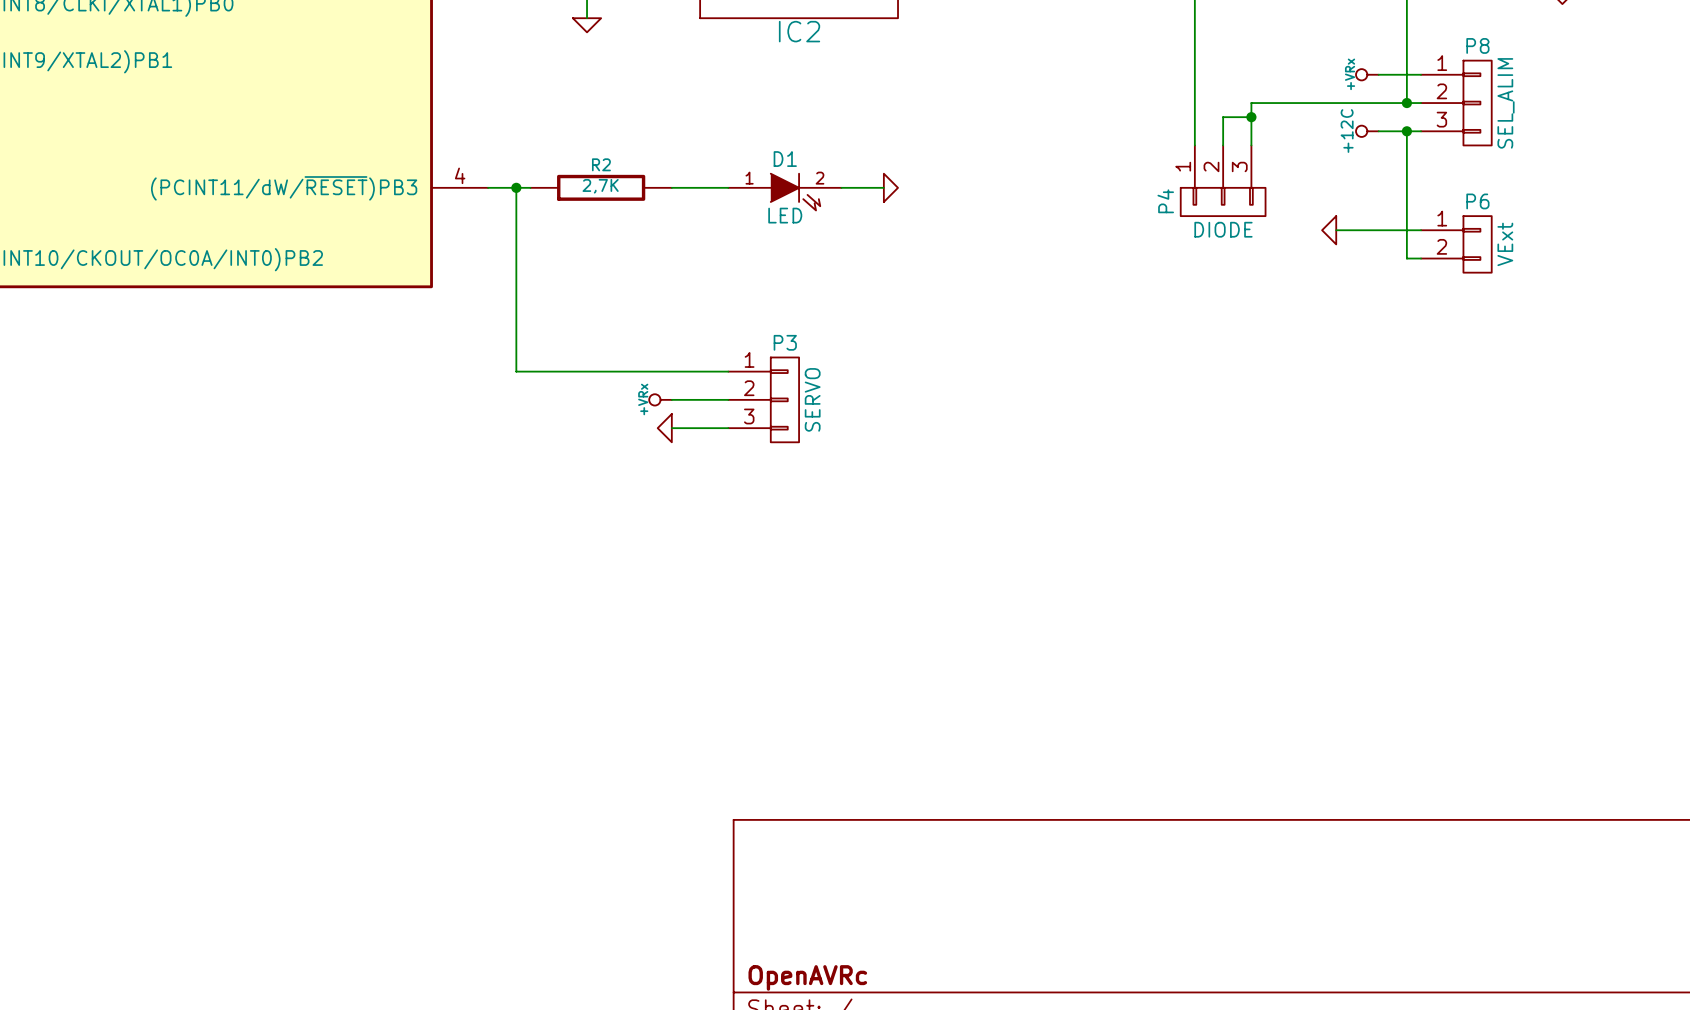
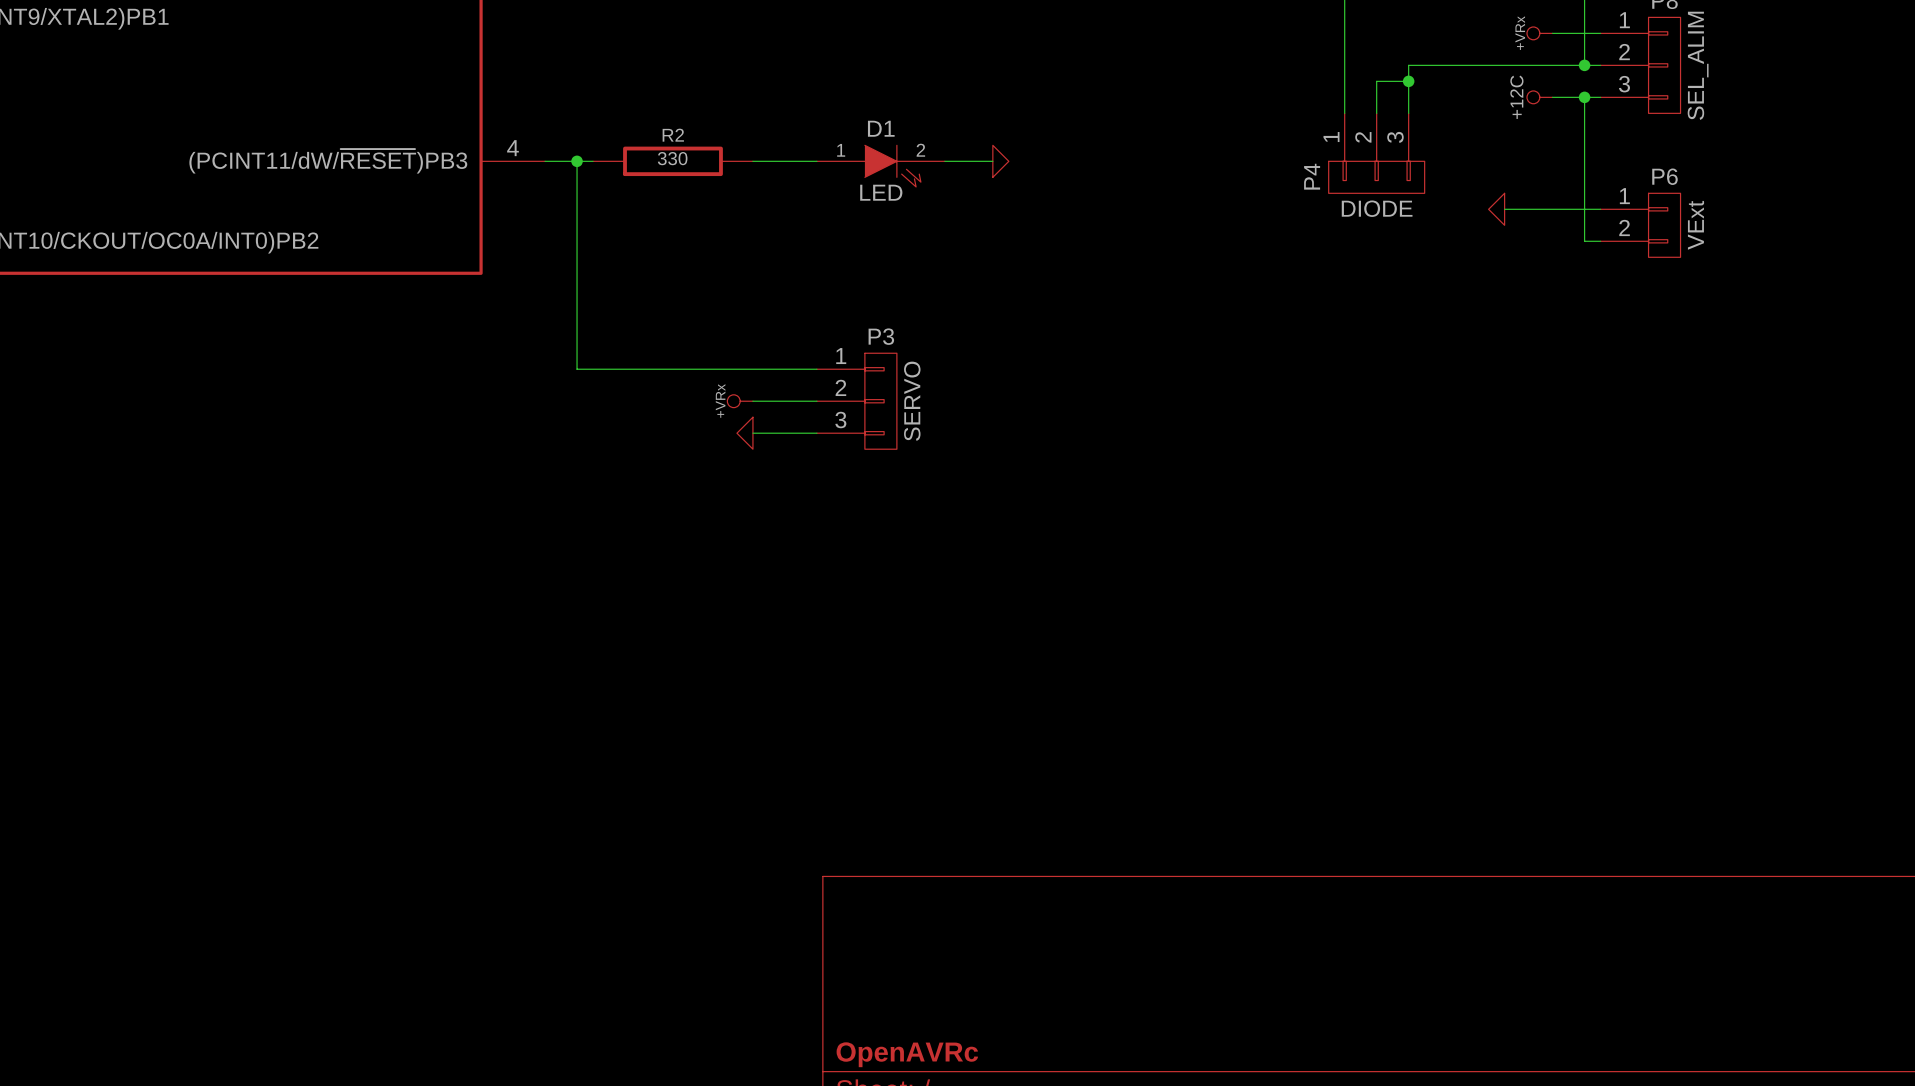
R2 value: 2,7K (600, 186) -> 330 (672, 158)

